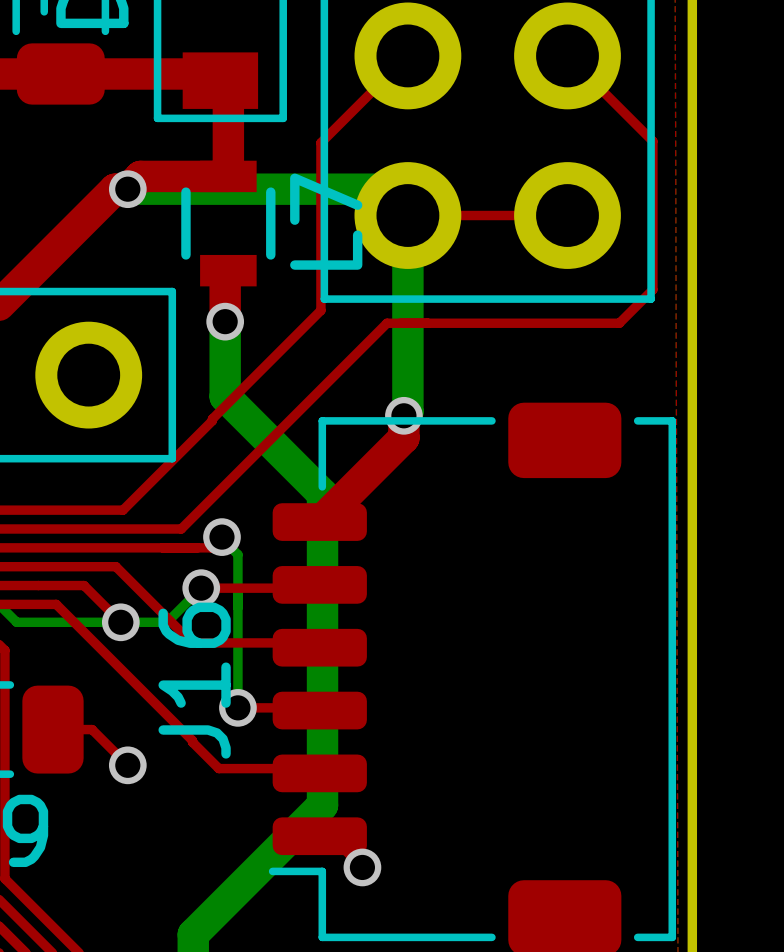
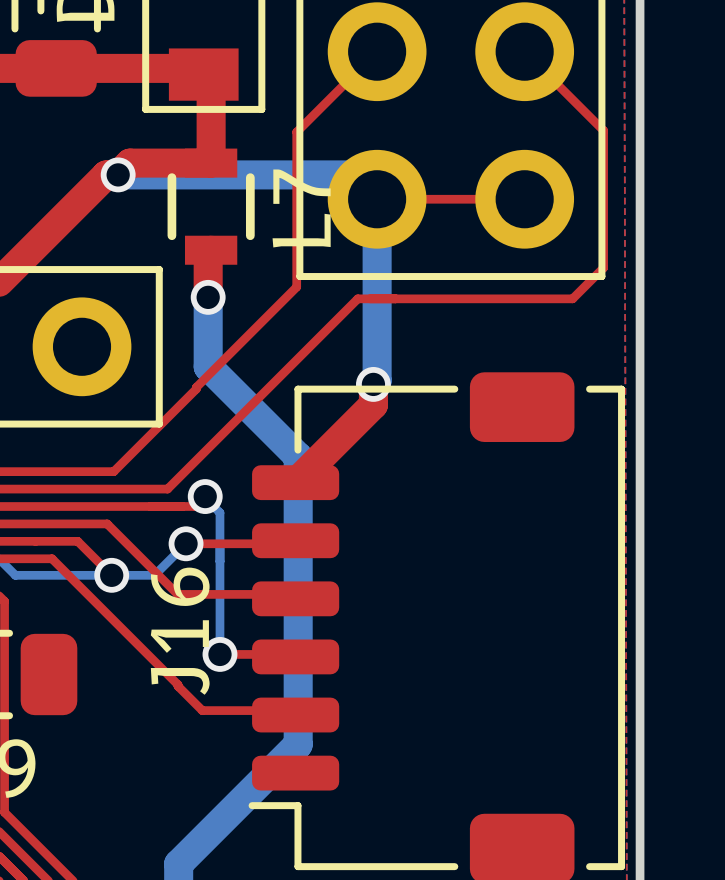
top track: (52, 729) (92, 729) (127, 765) -> none
via: (127, 765) -> none
via: (362, 867) -> none

